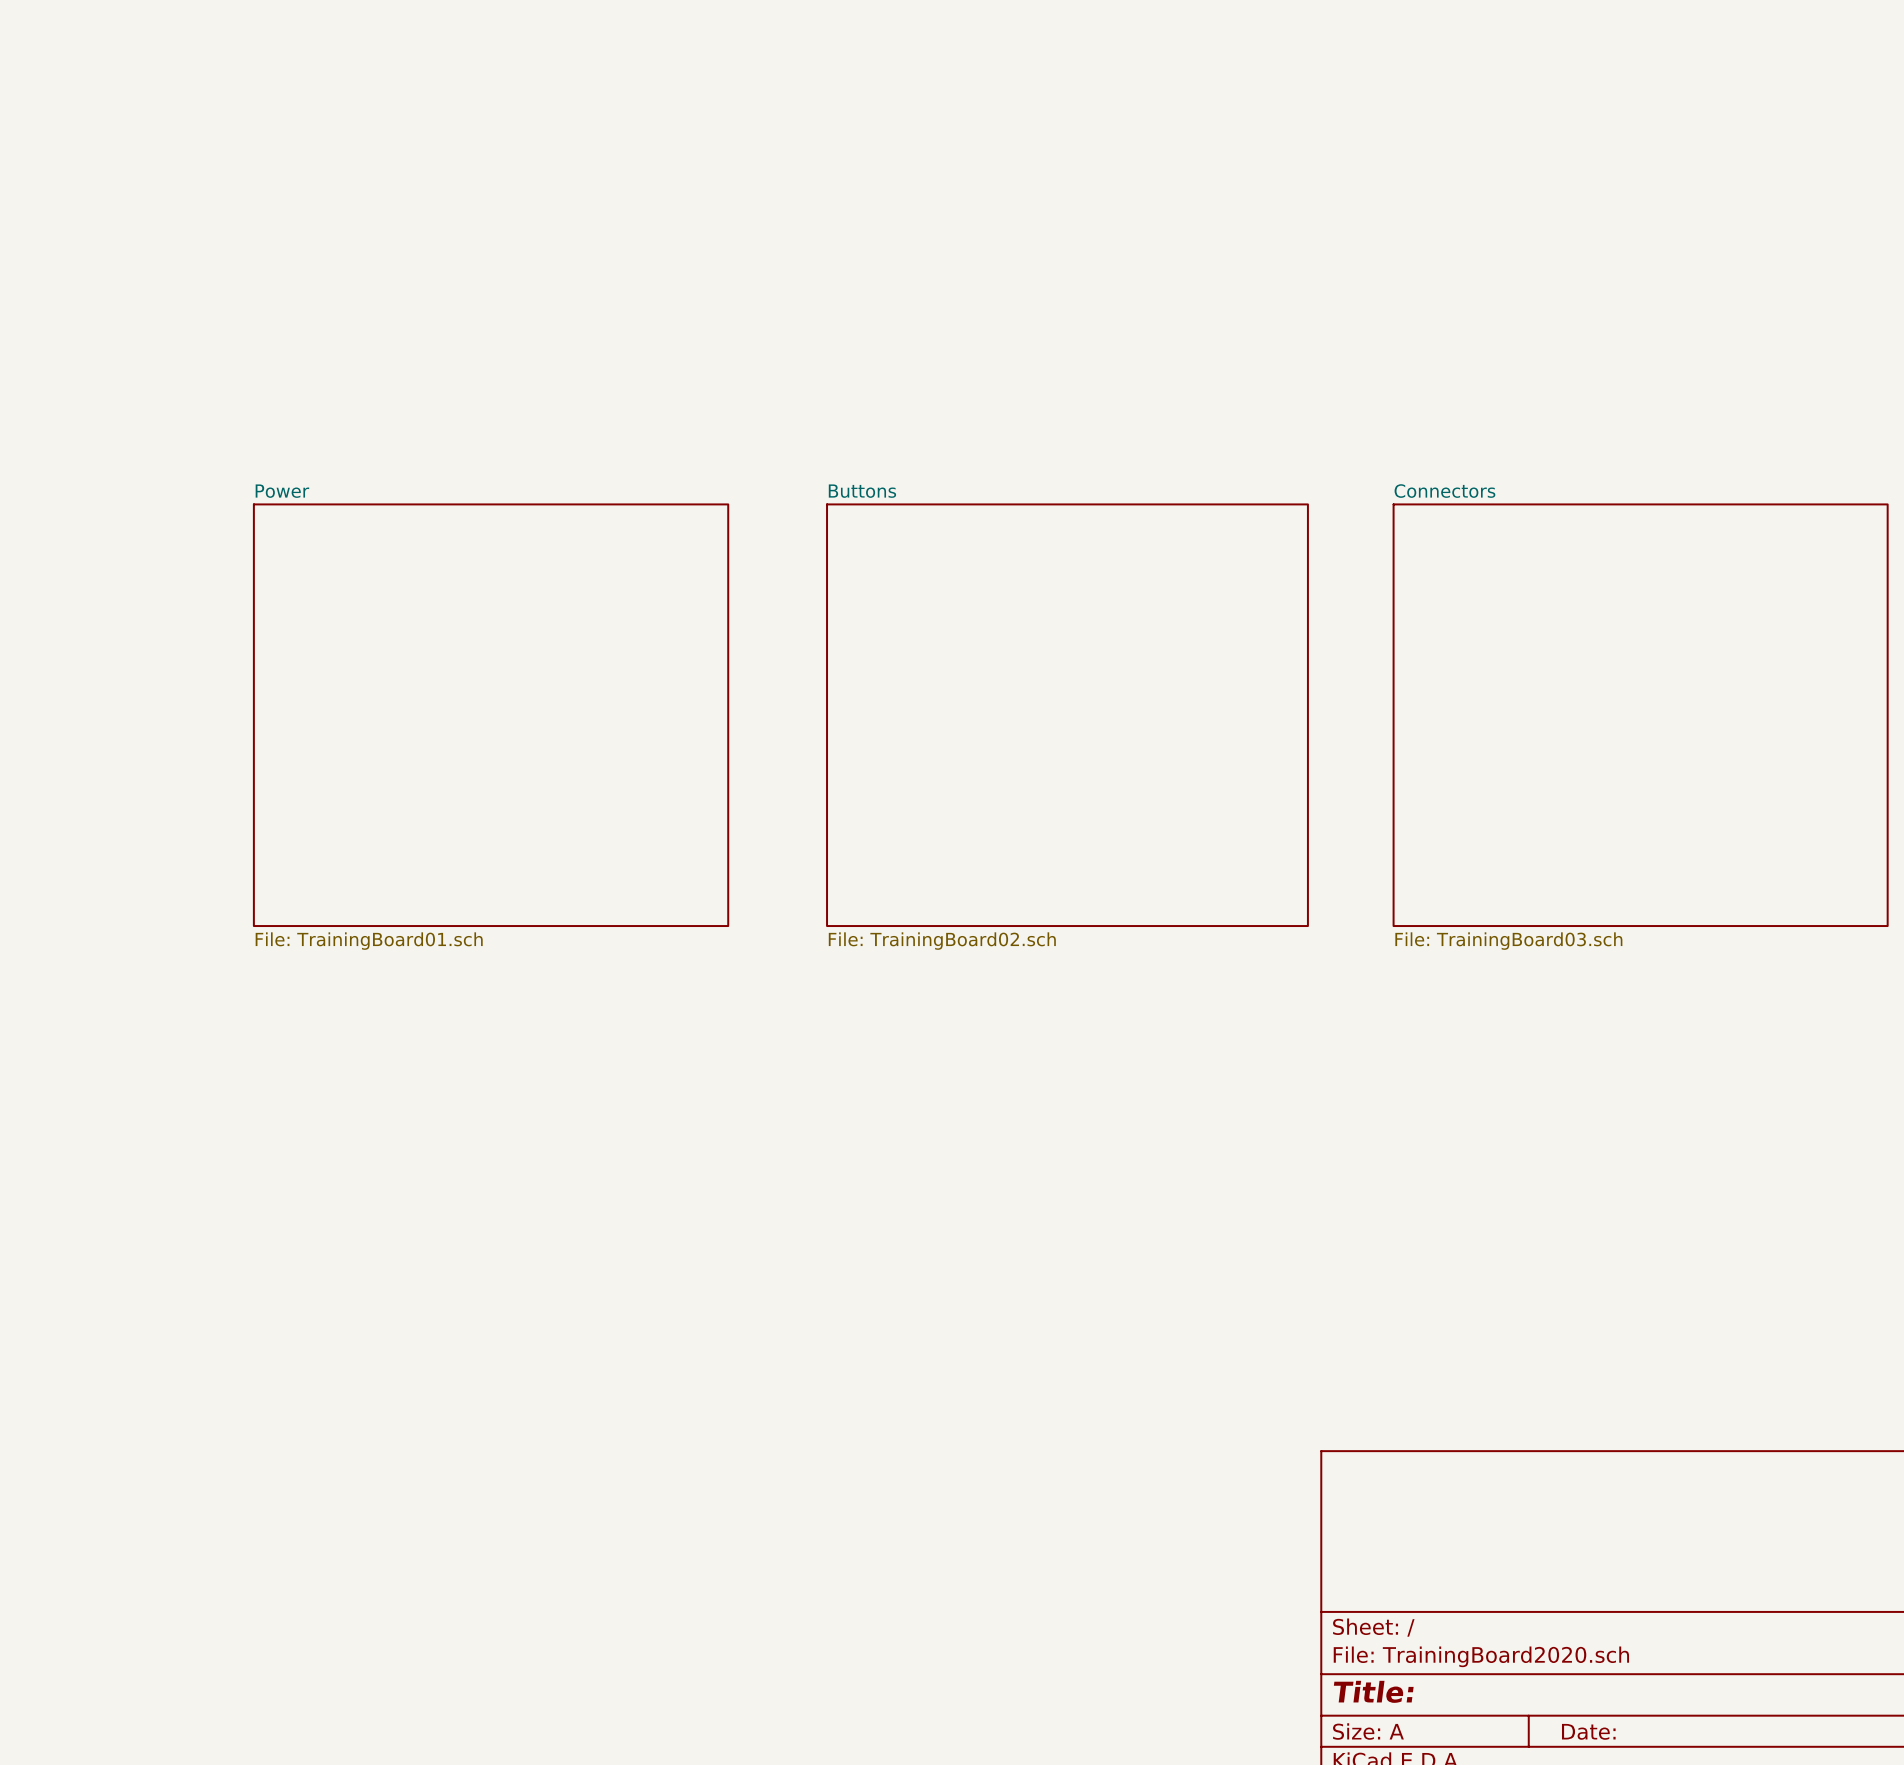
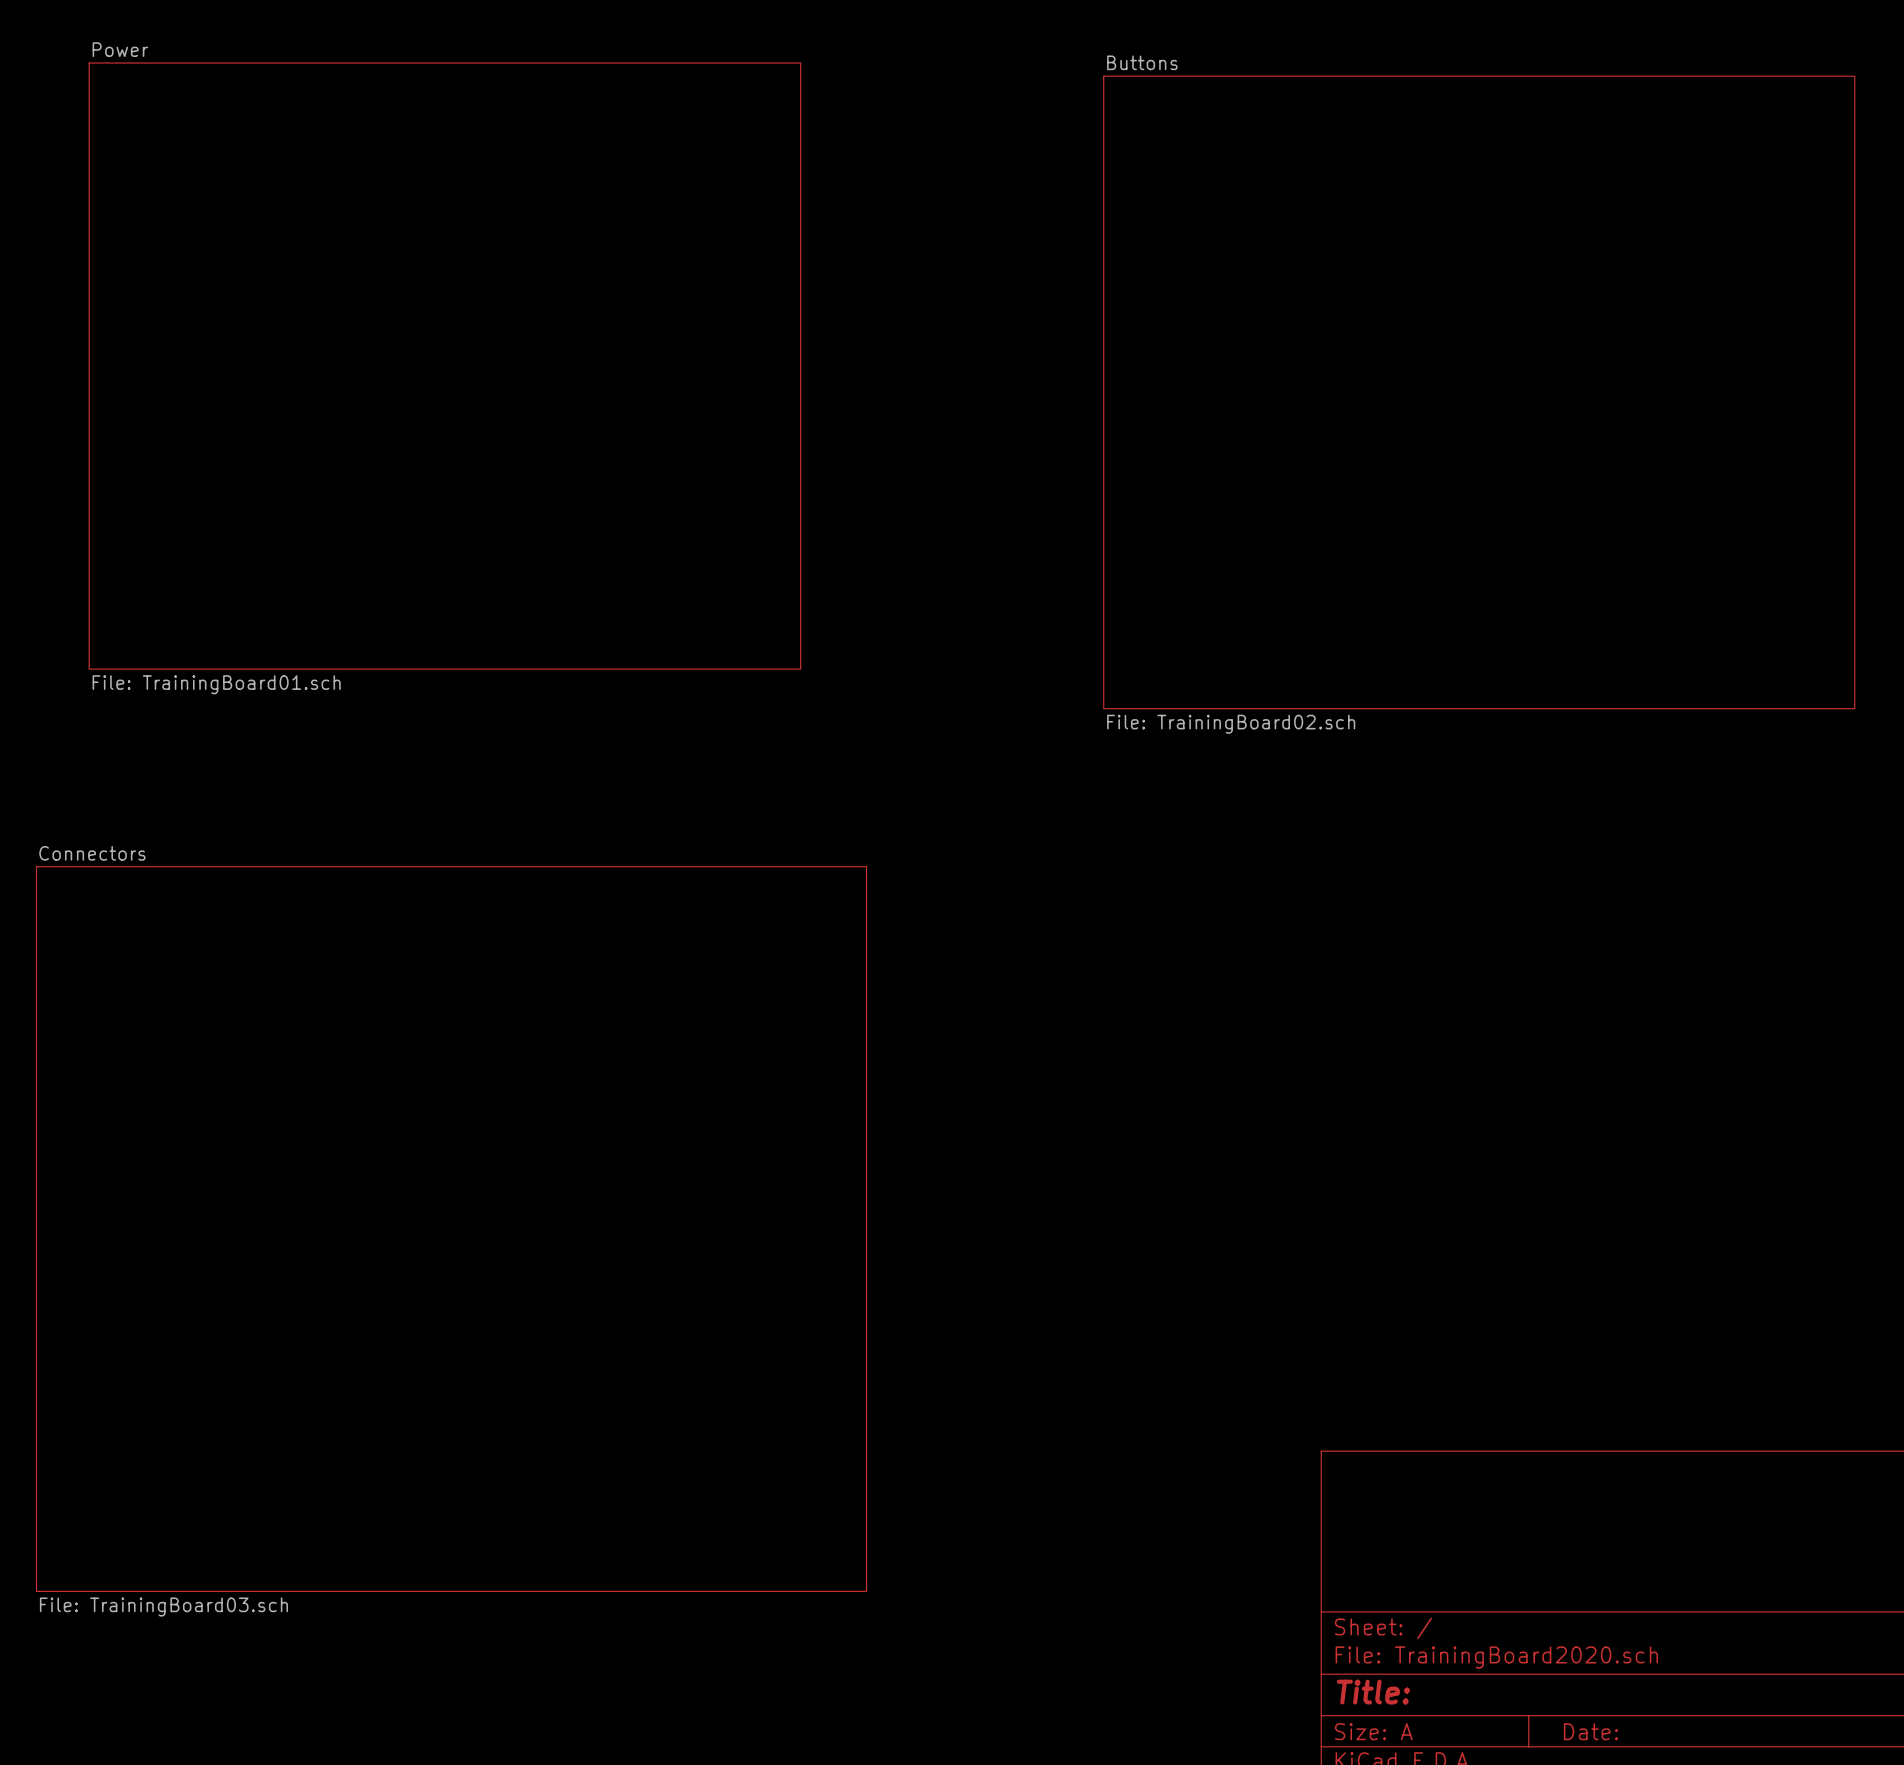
sheet Power: none -> File: TrainingBoard01.sch (444, 366)
sheet Buttons: none -> File: TrainingBoard02.sch (1479, 392)
sheet Power: File: TrainingBoard01.sch (491, 715) -> none
sheet Buttons: File: TrainingBoard02.sch (1067, 715) -> none
sheet Connectors: File: TrainingBoard03.sch (1640, 715) -> none
sheet Connectors: none -> File: TrainingBoard03.sch (451, 1229)

